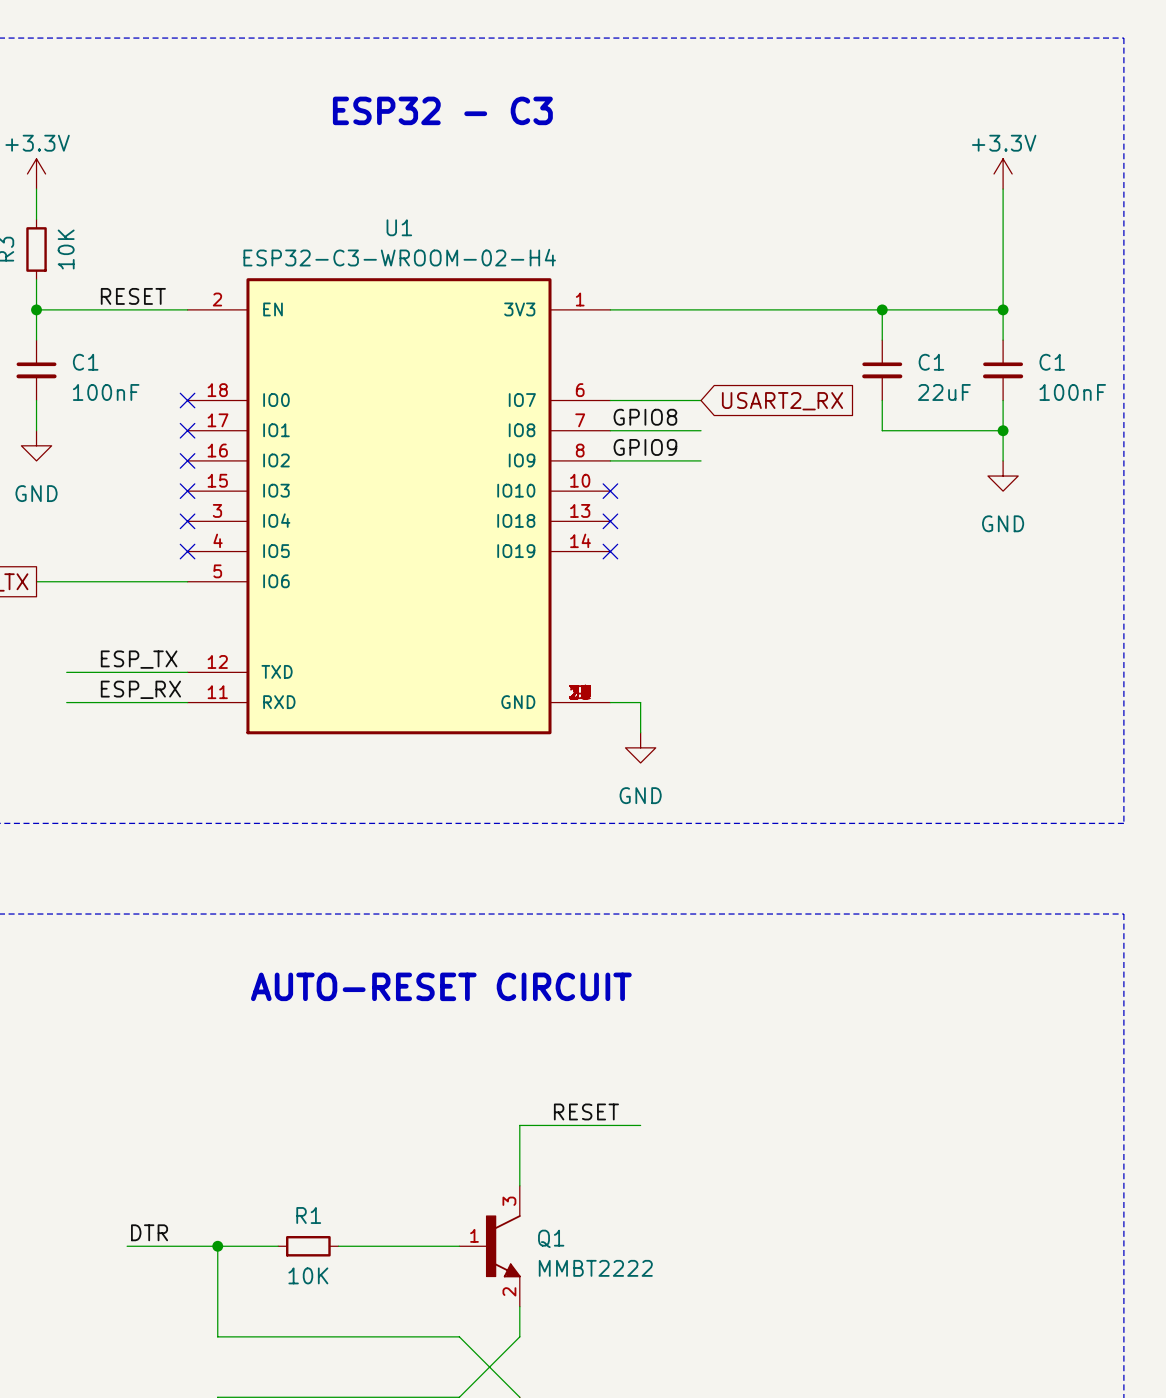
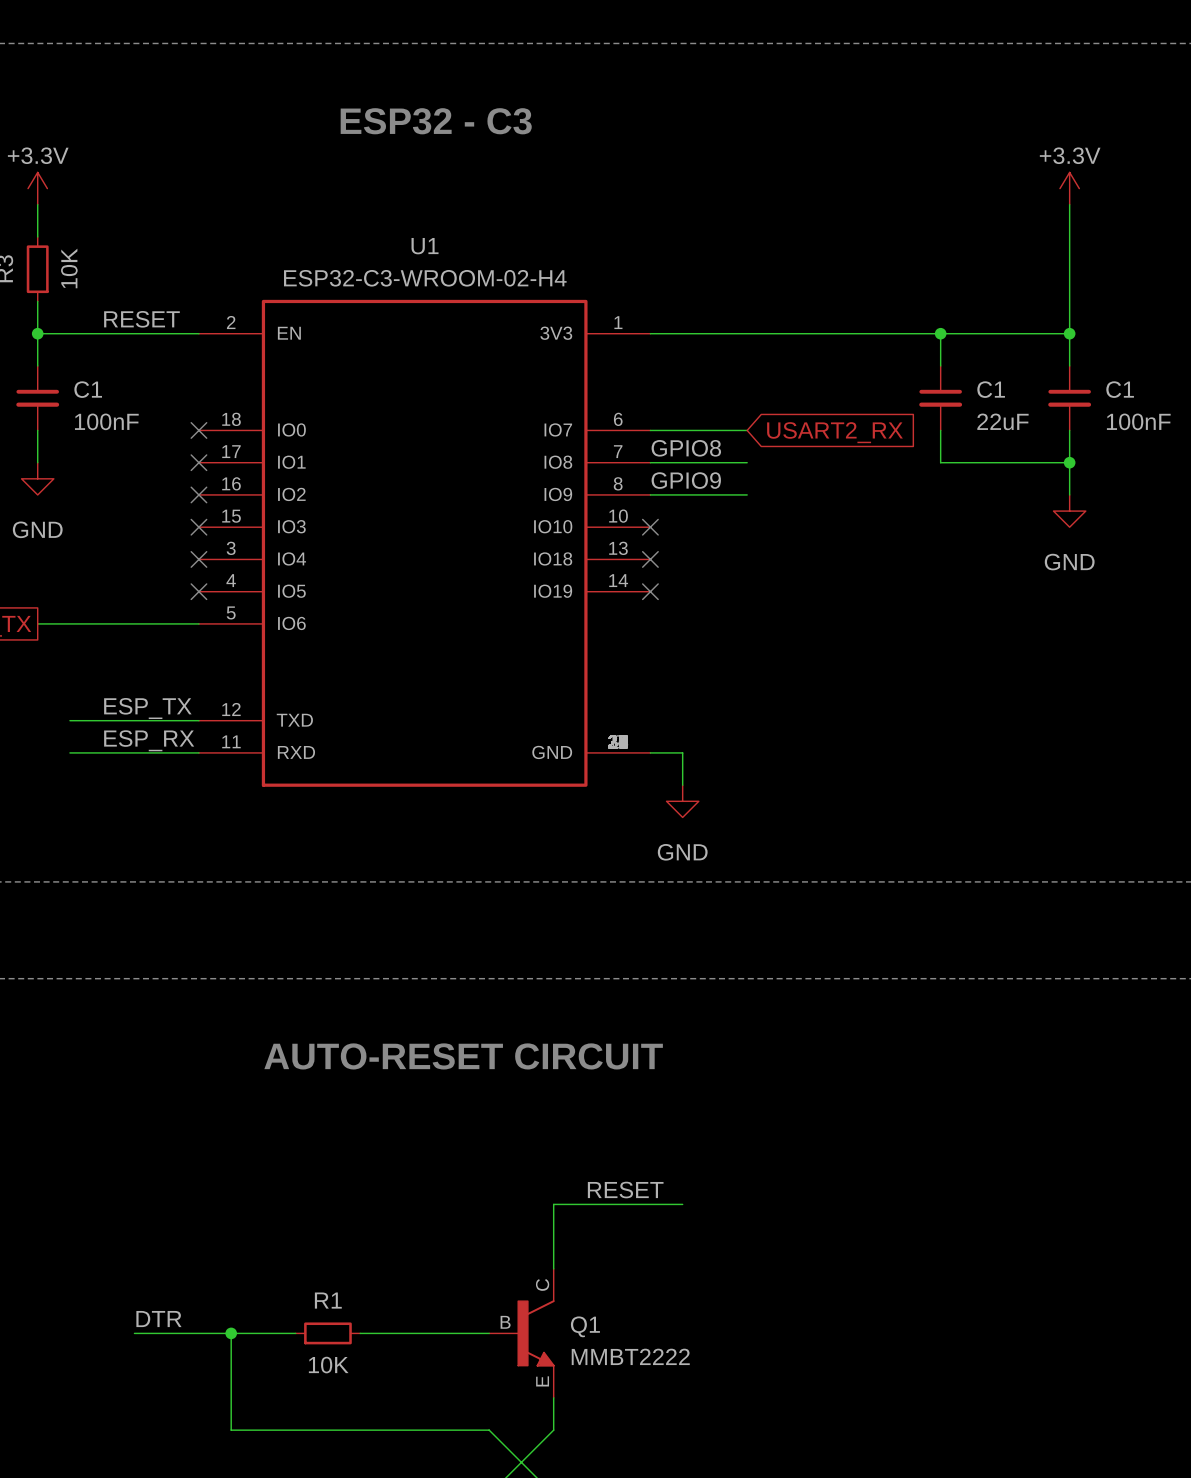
Q1 pin number: 3 (509, 1201) -> C (542, 1284)
Q1 pin number: 1 (474, 1235) -> B (505, 1322)
Q1 pin number: 2 (509, 1291) -> E (542, 1381)

